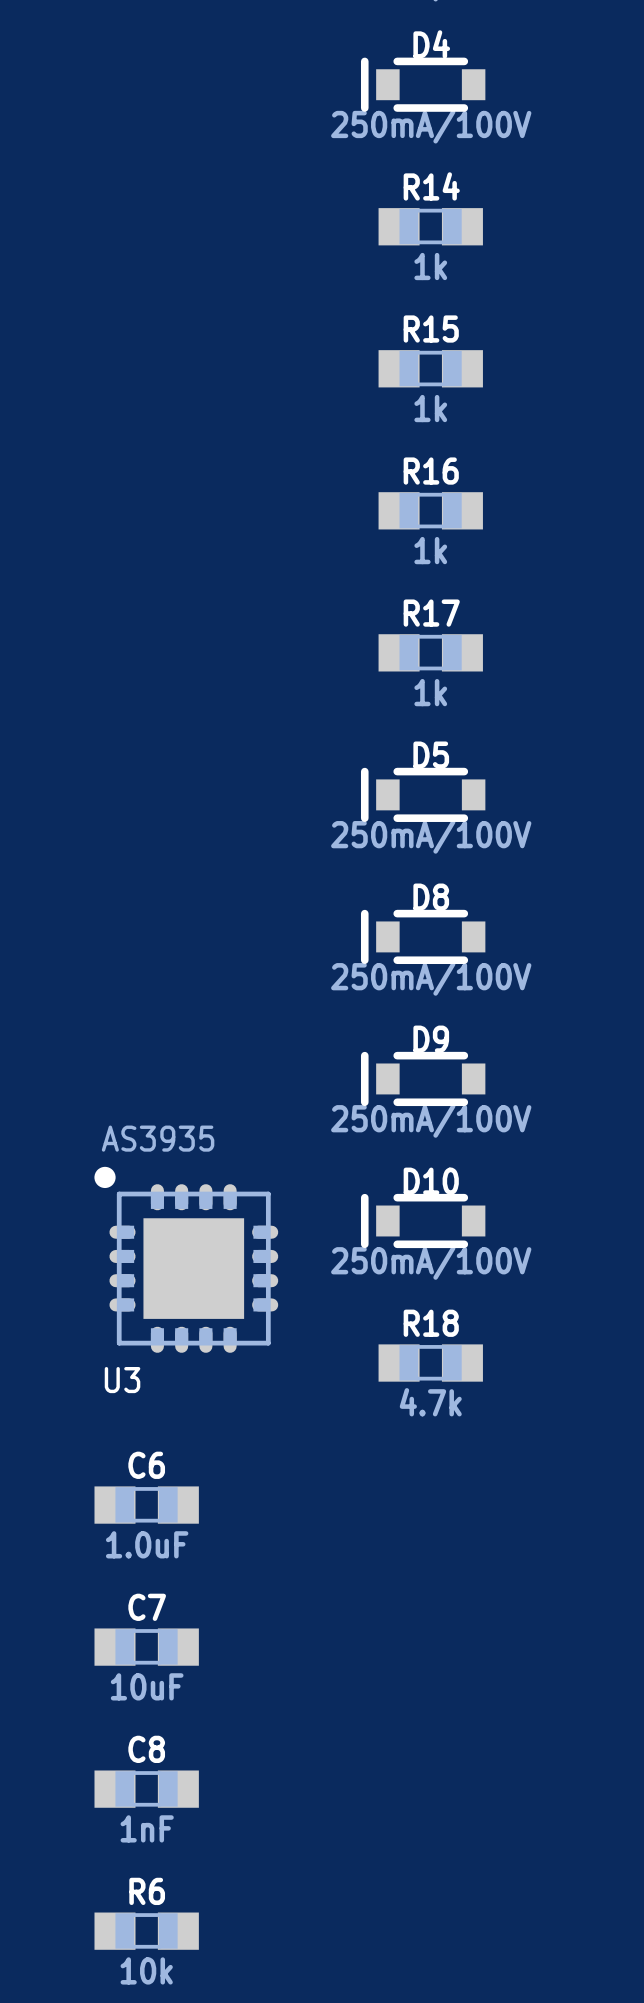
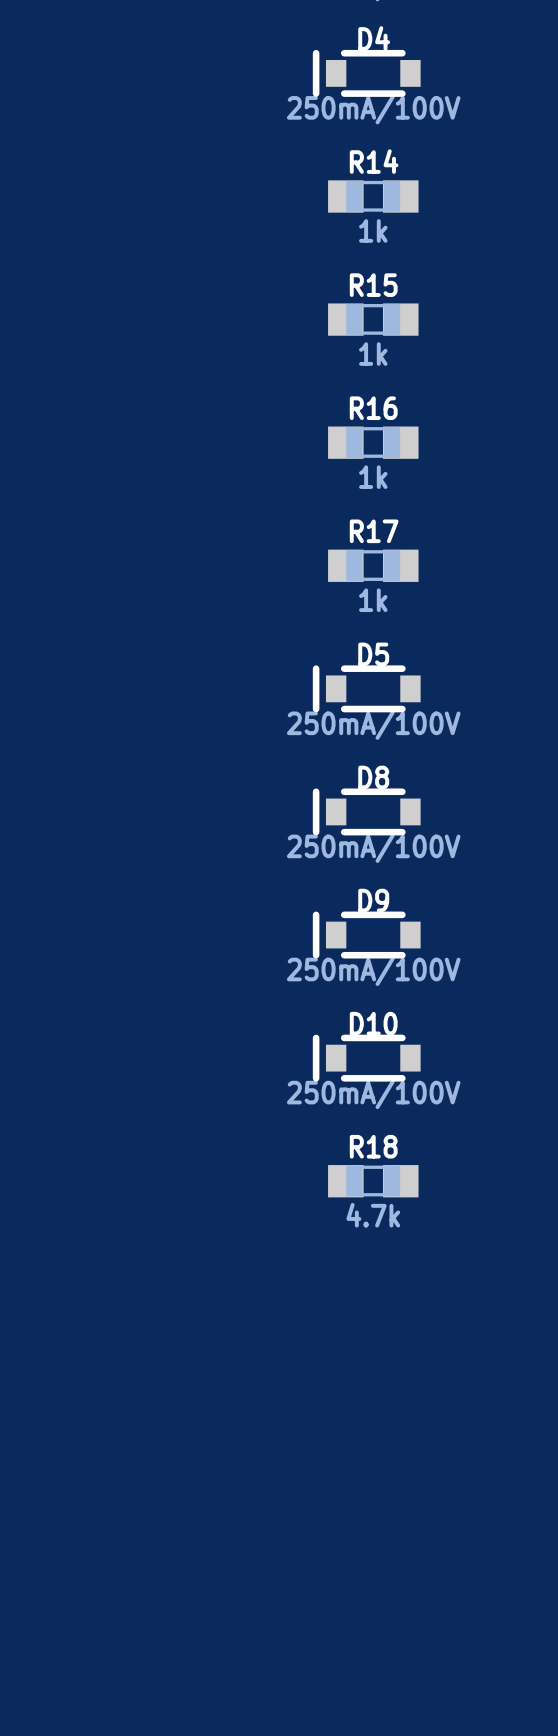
U3: AS3935 (186, 1259) -> none
C6: 1.0uF (146, 1505) -> none
C7: 10uF (146, 1647) -> none
C8: 1nF (146, 1789) -> none
R6: 10k (146, 1931) -> none

